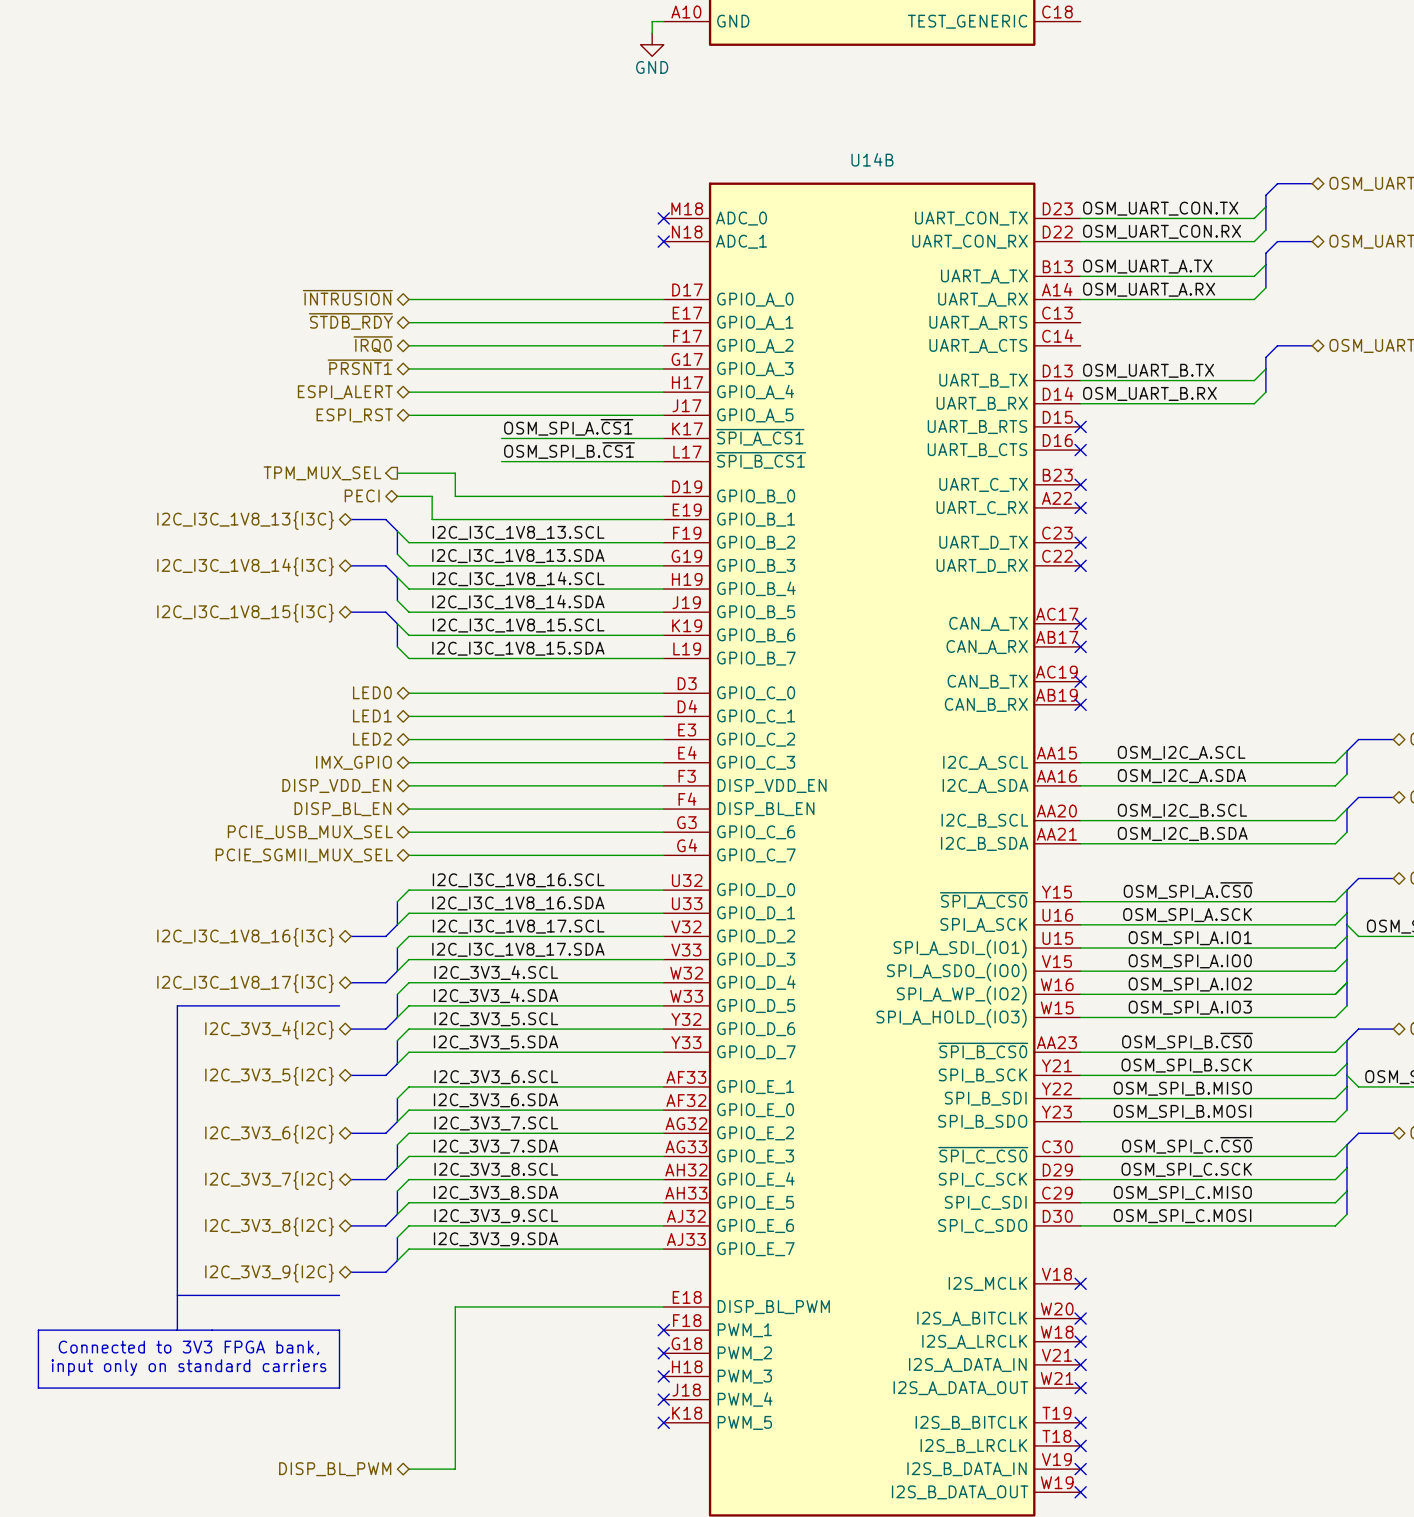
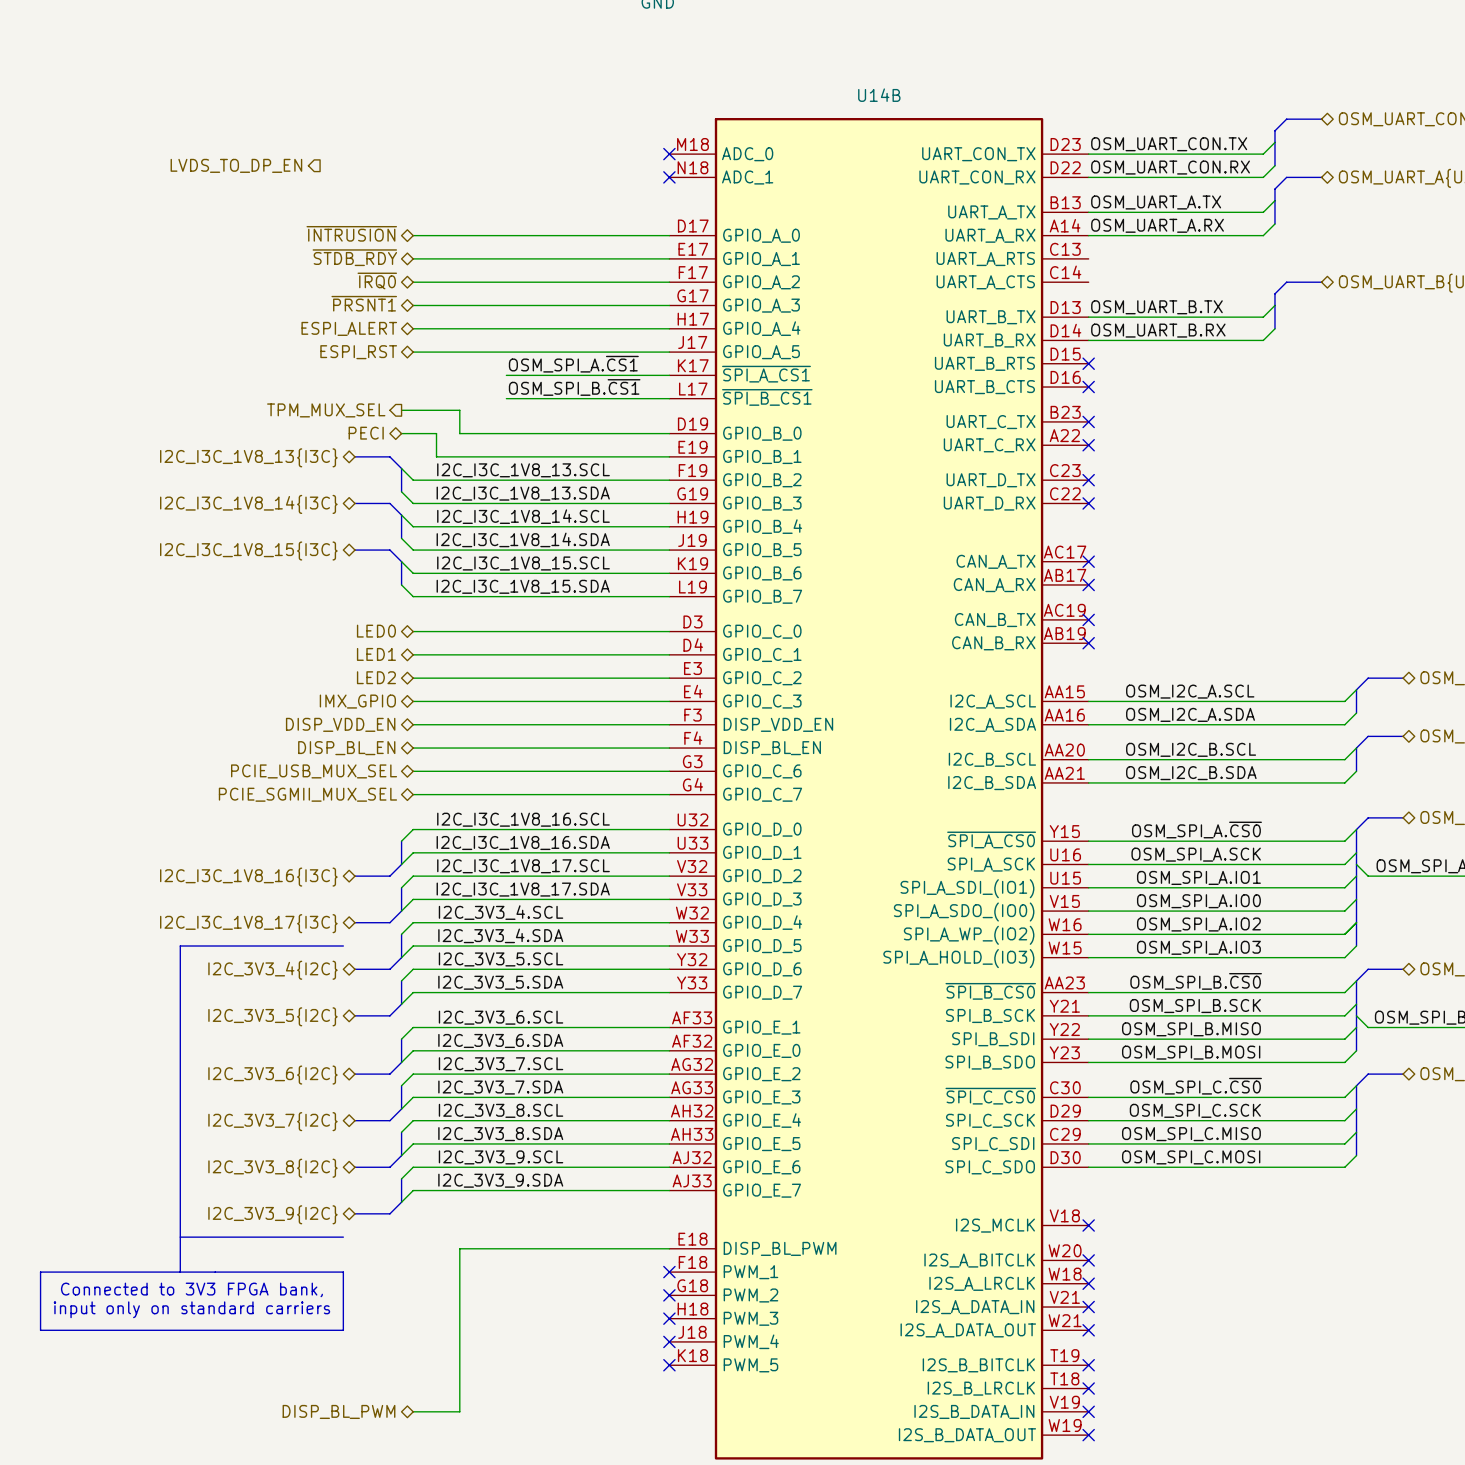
hierarchical label: none -> LVDS_TO_DP_EN (236, 165)

